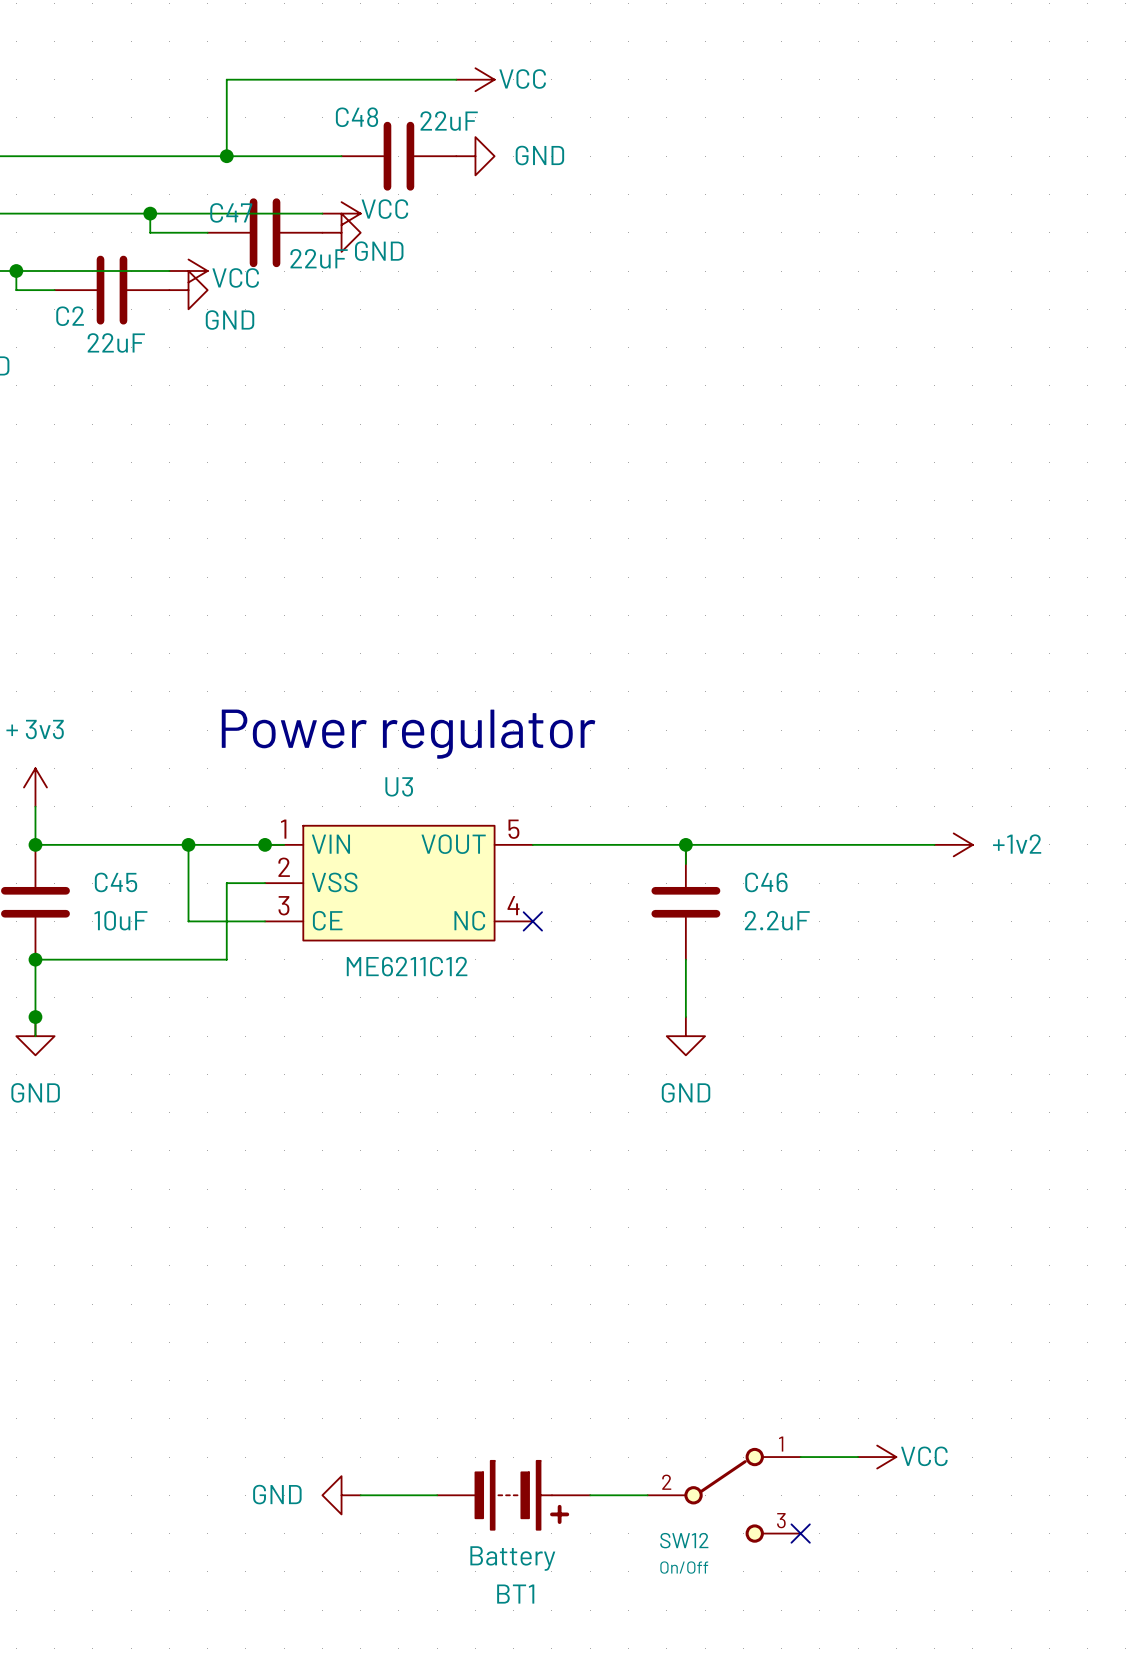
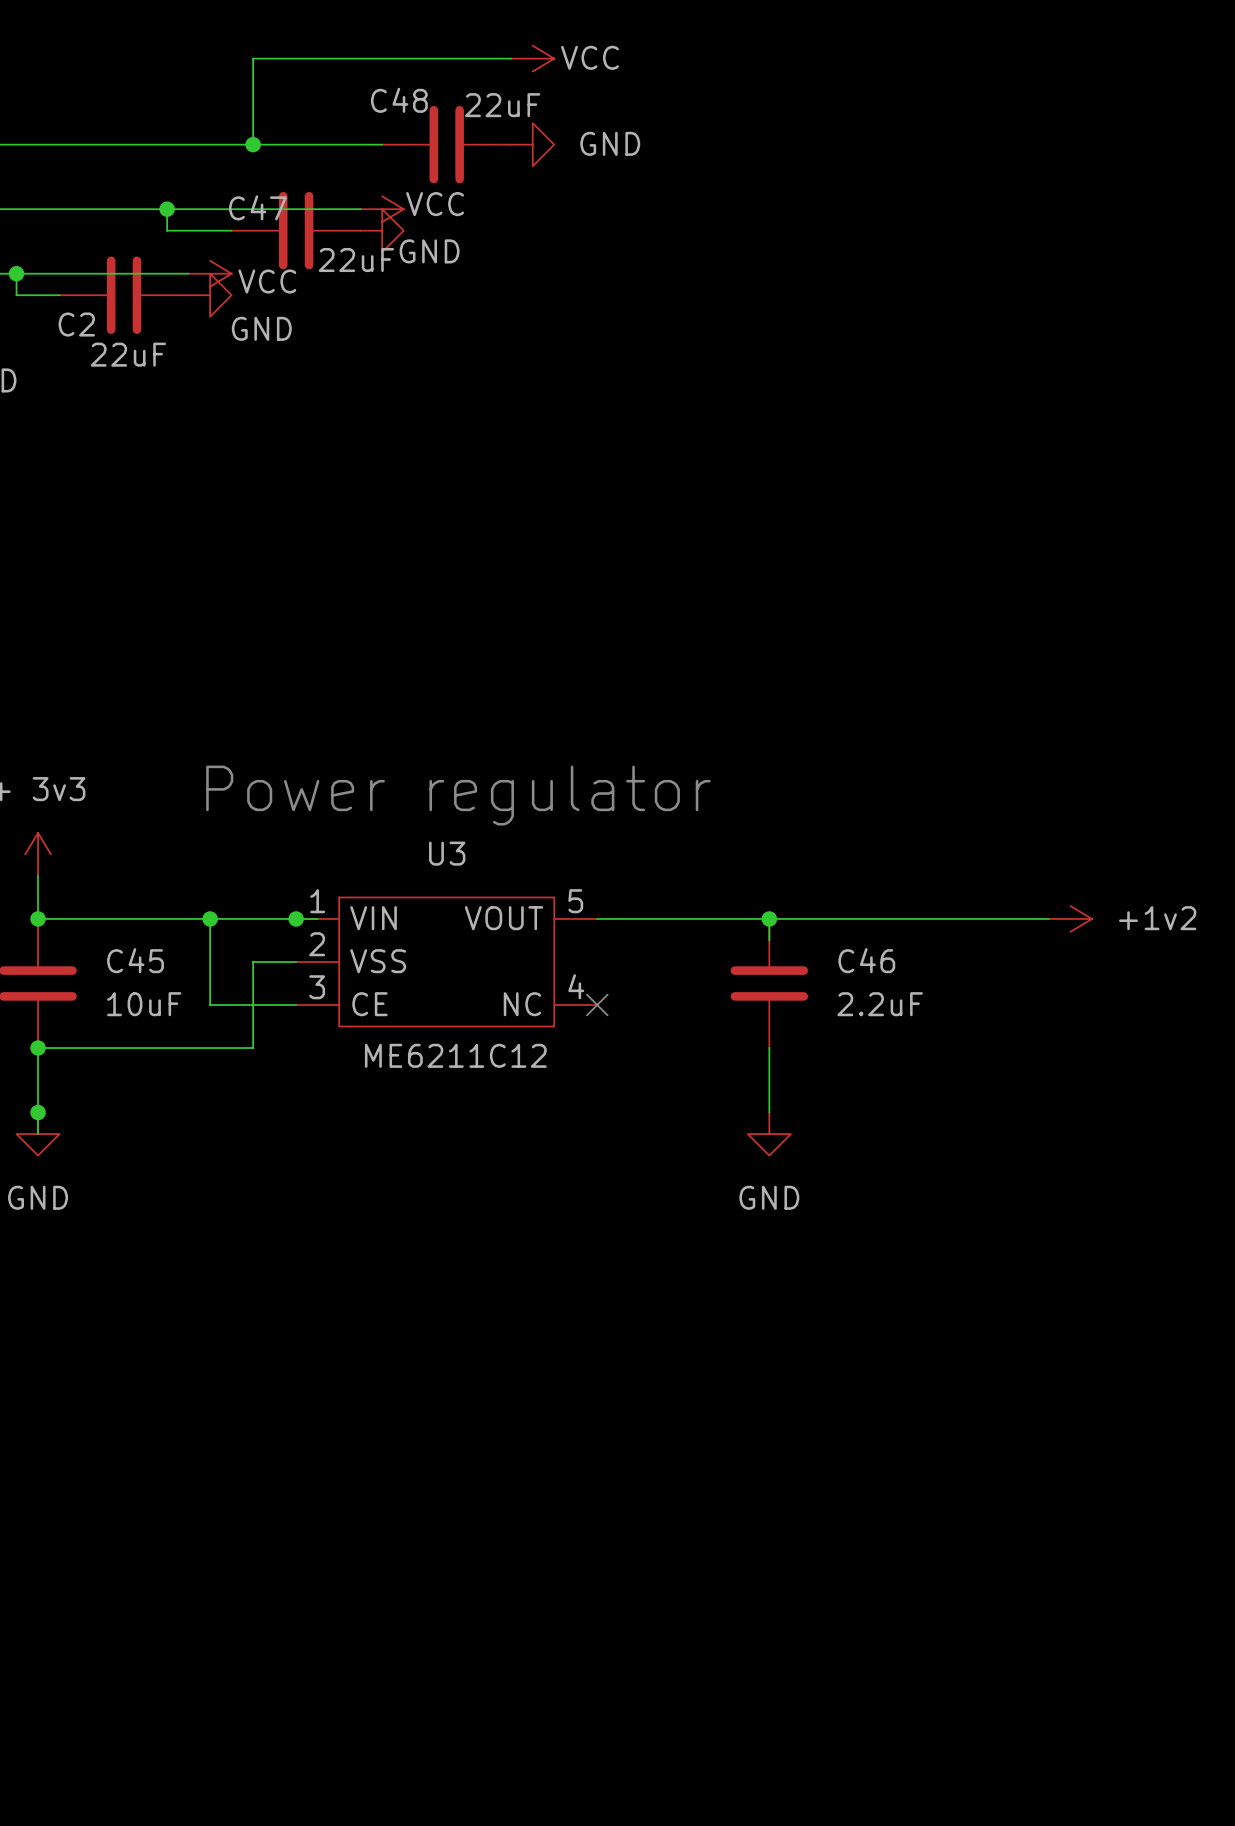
wire: (800, 1457) (858, 1457) -> none
power symbol: VCC (877, 1457) -> none
power symbol: GND (341, 1495) -> none
wire: (360, 1495) (437, 1495) -> none
BT1: Battery (513, 1495) -> none
wire: (590, 1495) (647, 1495) -> none
SW12: On/Off (724, 1495) -> none
no-connect mark: (800, 1533) -> none

